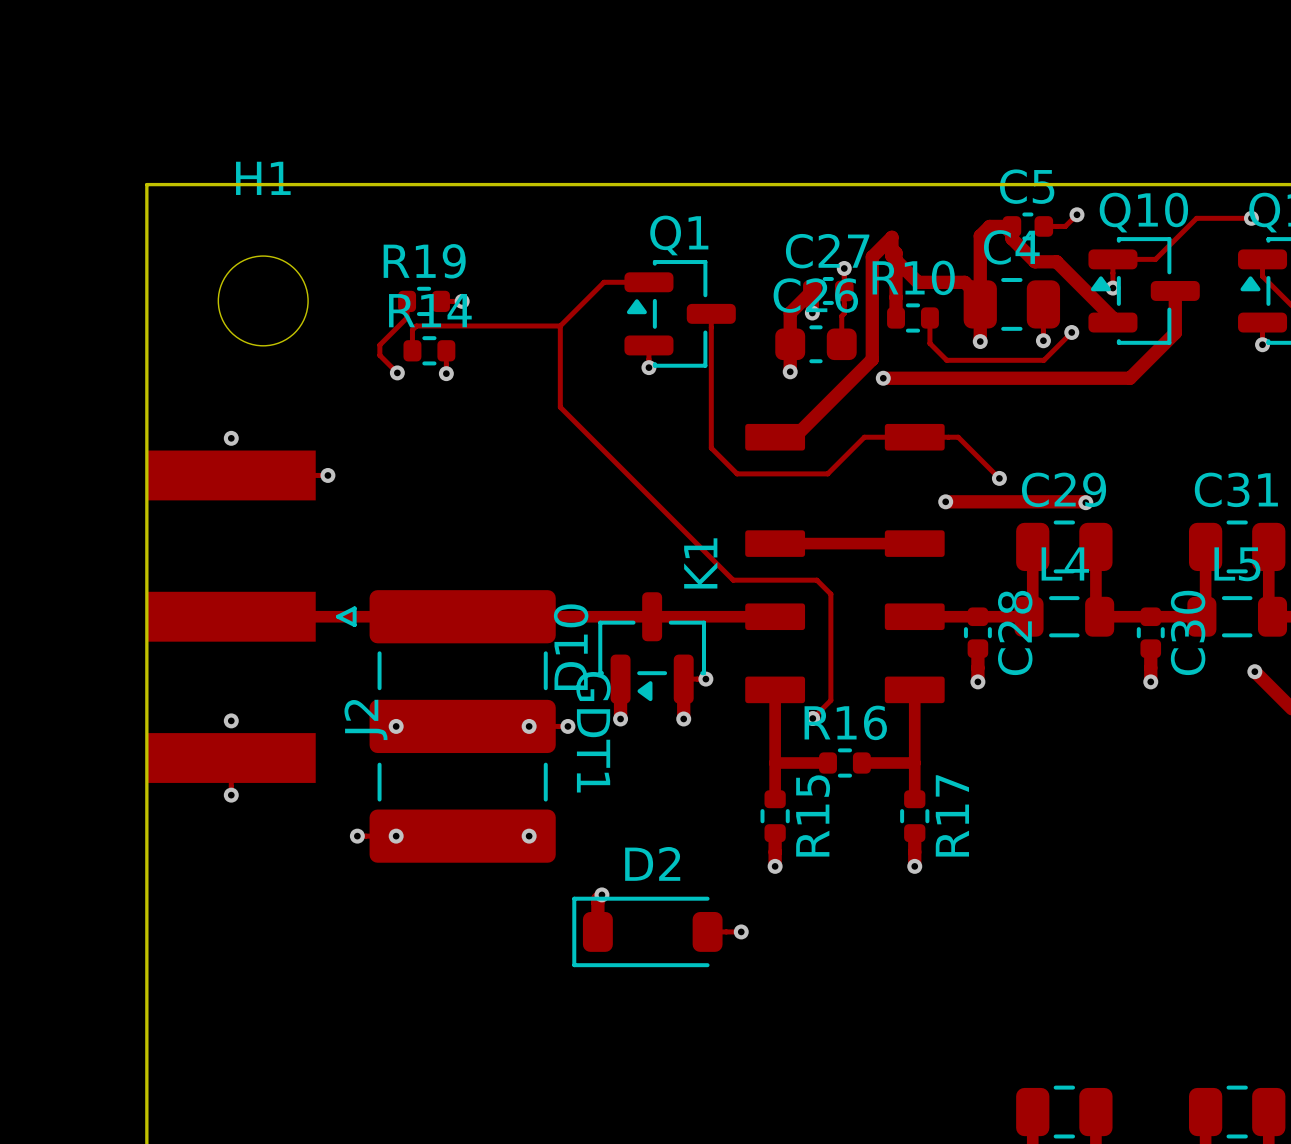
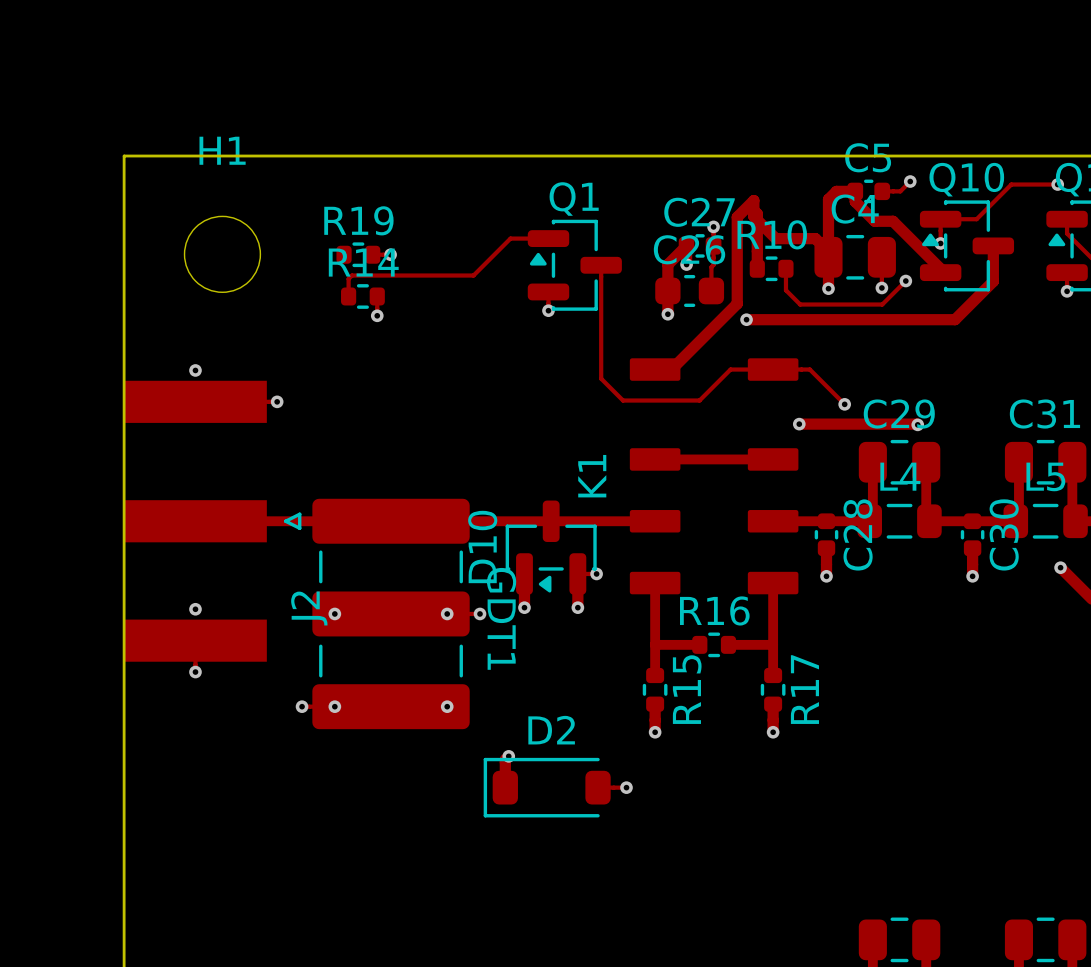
track: (407, 301) (407, 317) (379, 345) (379, 355) (397, 372) -> none
track: (560, 326) (560, 407) (733, 580) (816, 580) (830, 594) (830, 700) (812, 718) -> none
via: (397, 372) -> none
via: (812, 718) -> none

